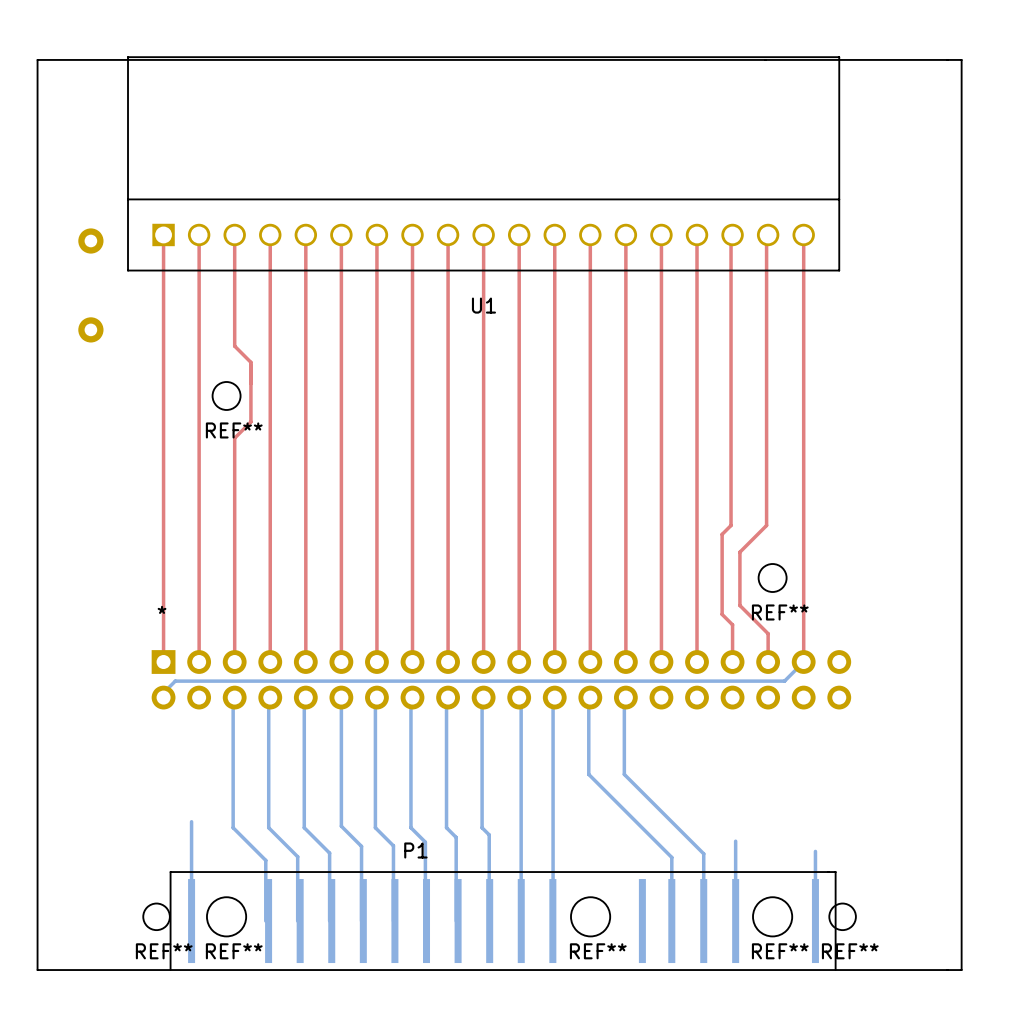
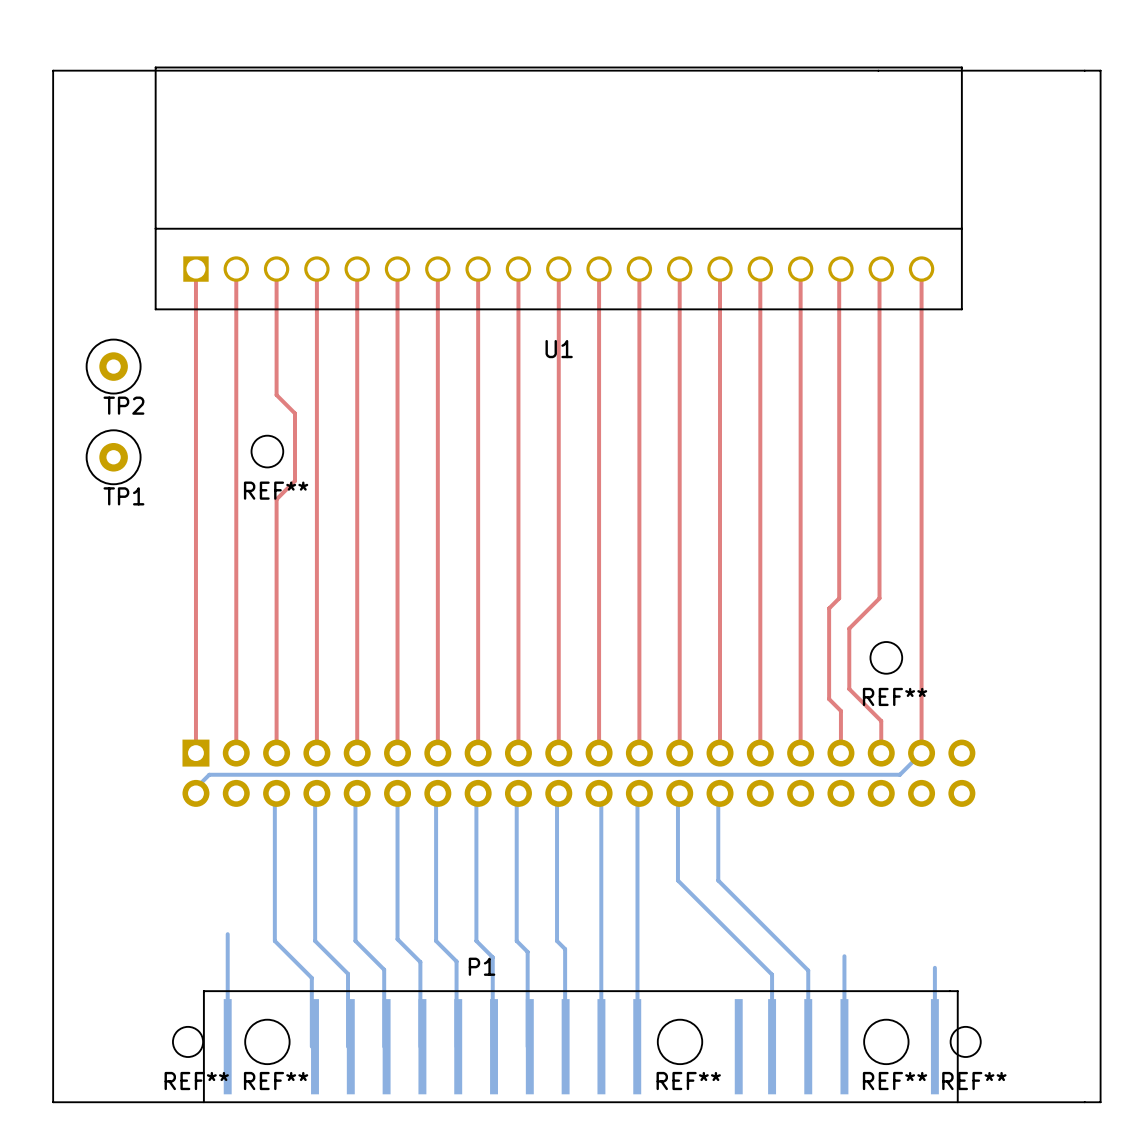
TP2 side: bottom (90, 240) -> top (113, 366)
TP1 side: bottom (90, 329) -> top (113, 457)
text: * (162, 609) -> none

